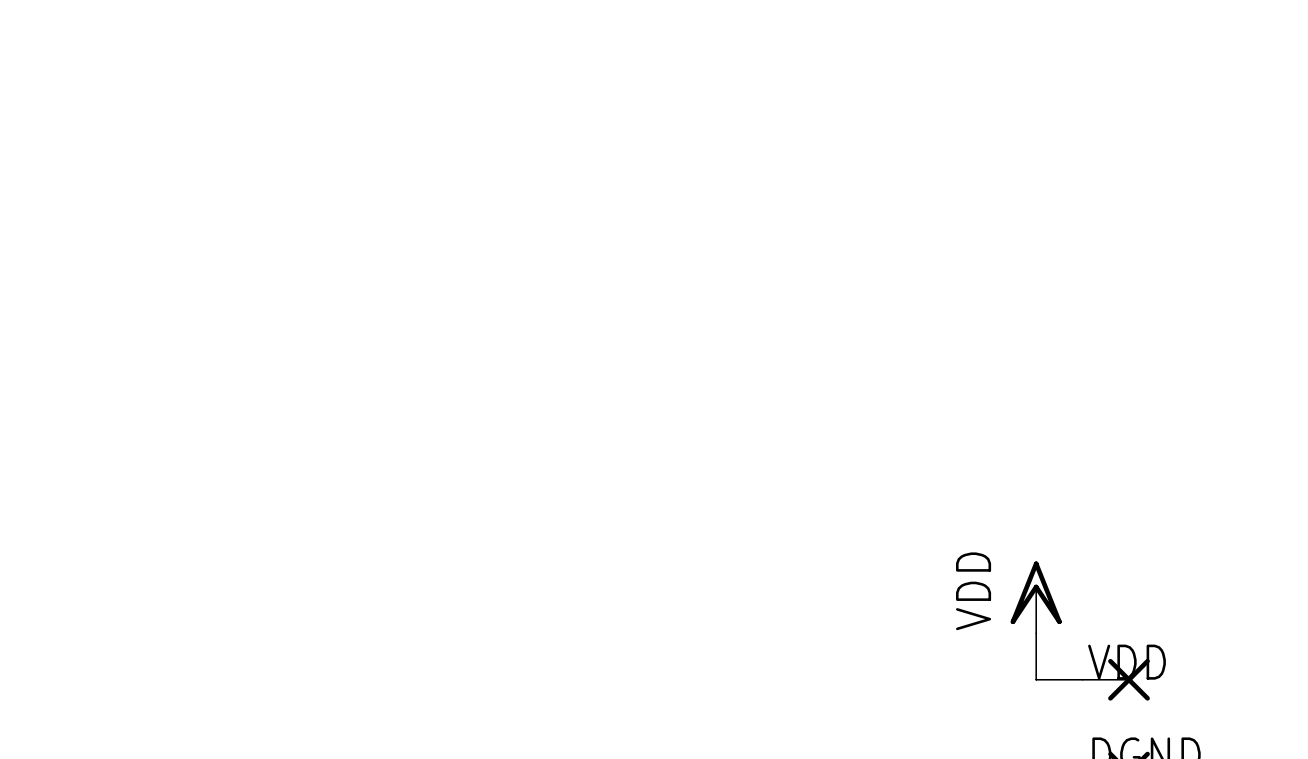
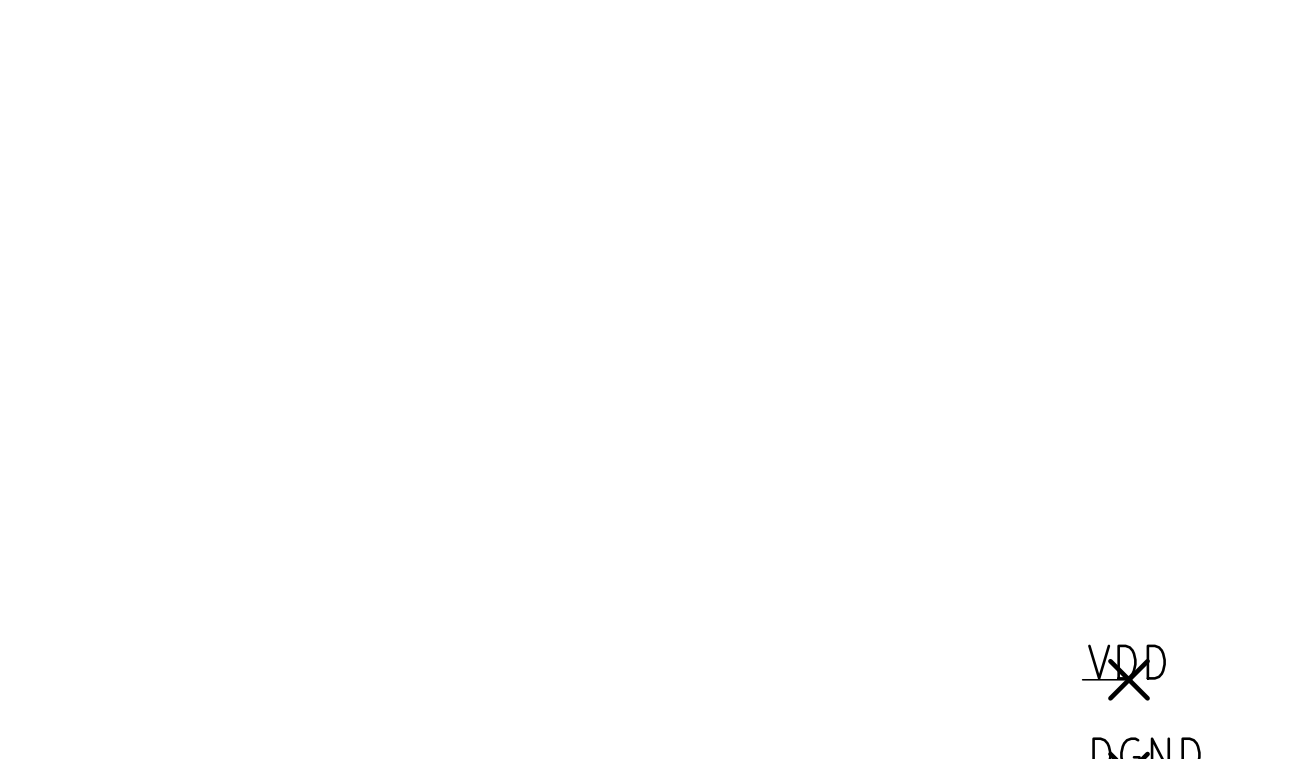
power symbol: VDD (1036, 597) -> none
wire: (1036, 633) (1036, 679) (1082, 679) -> none

